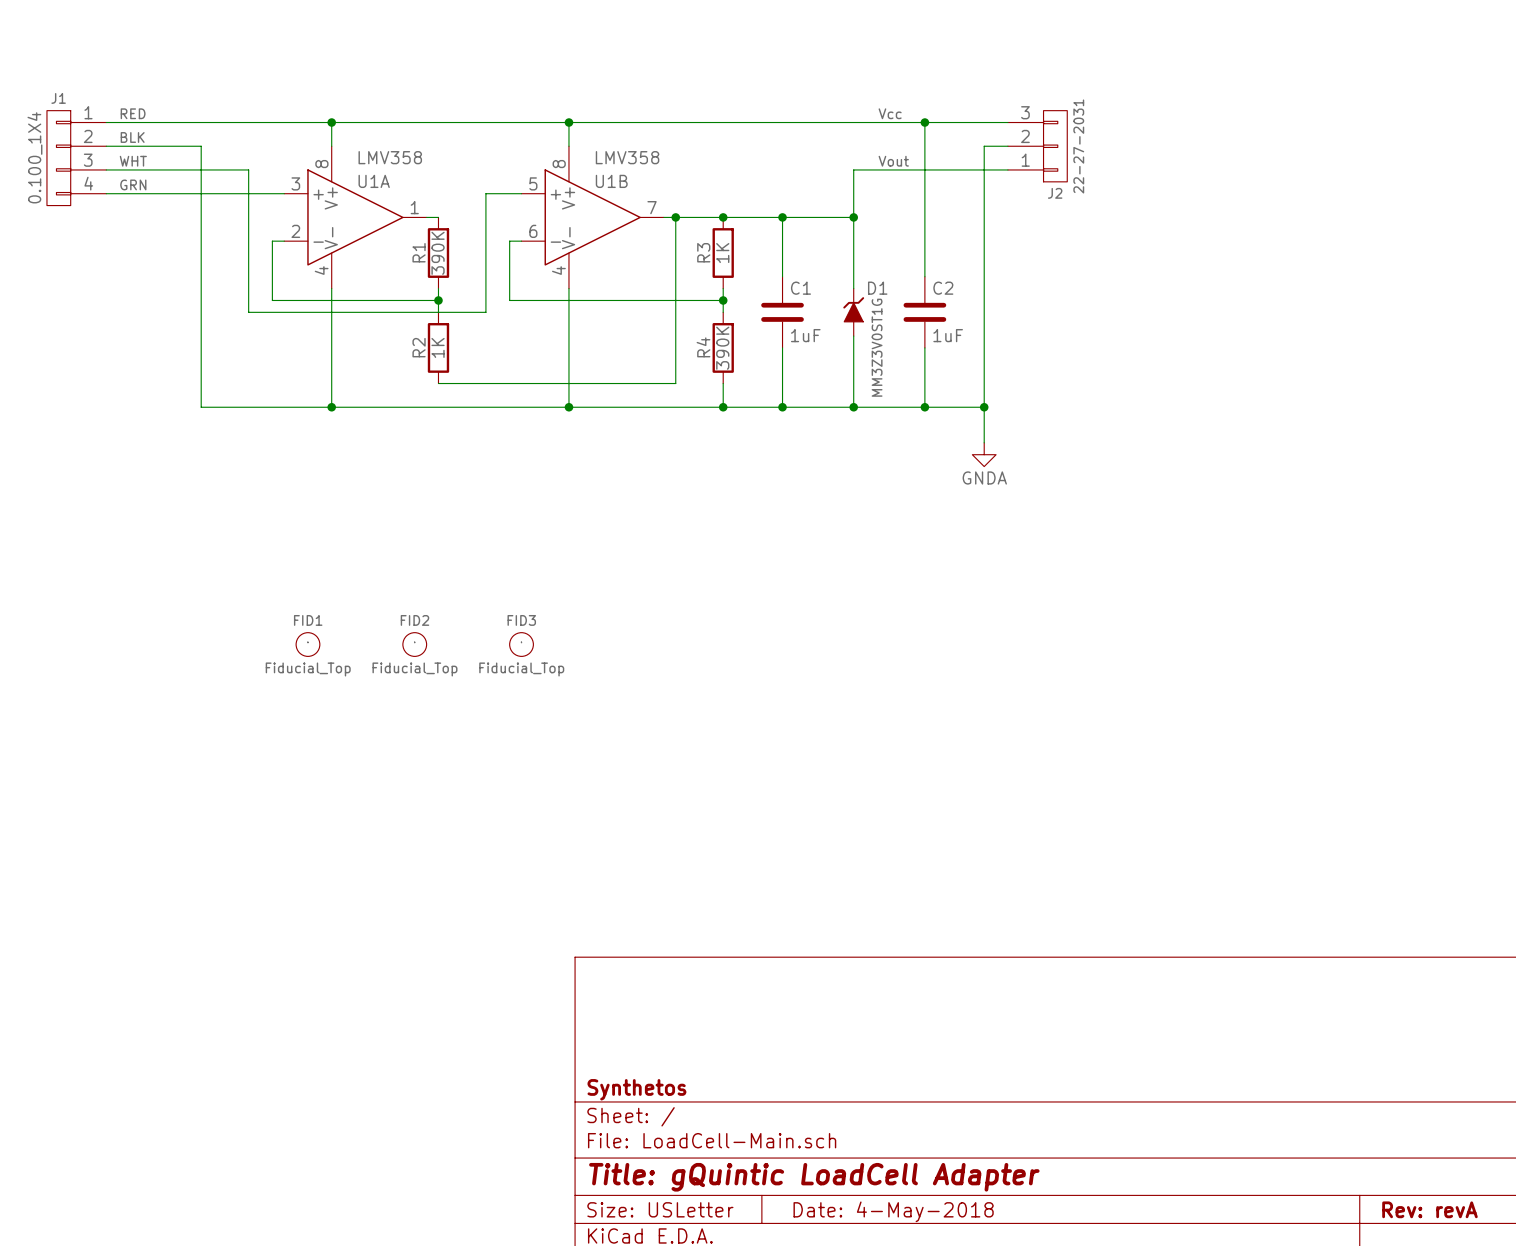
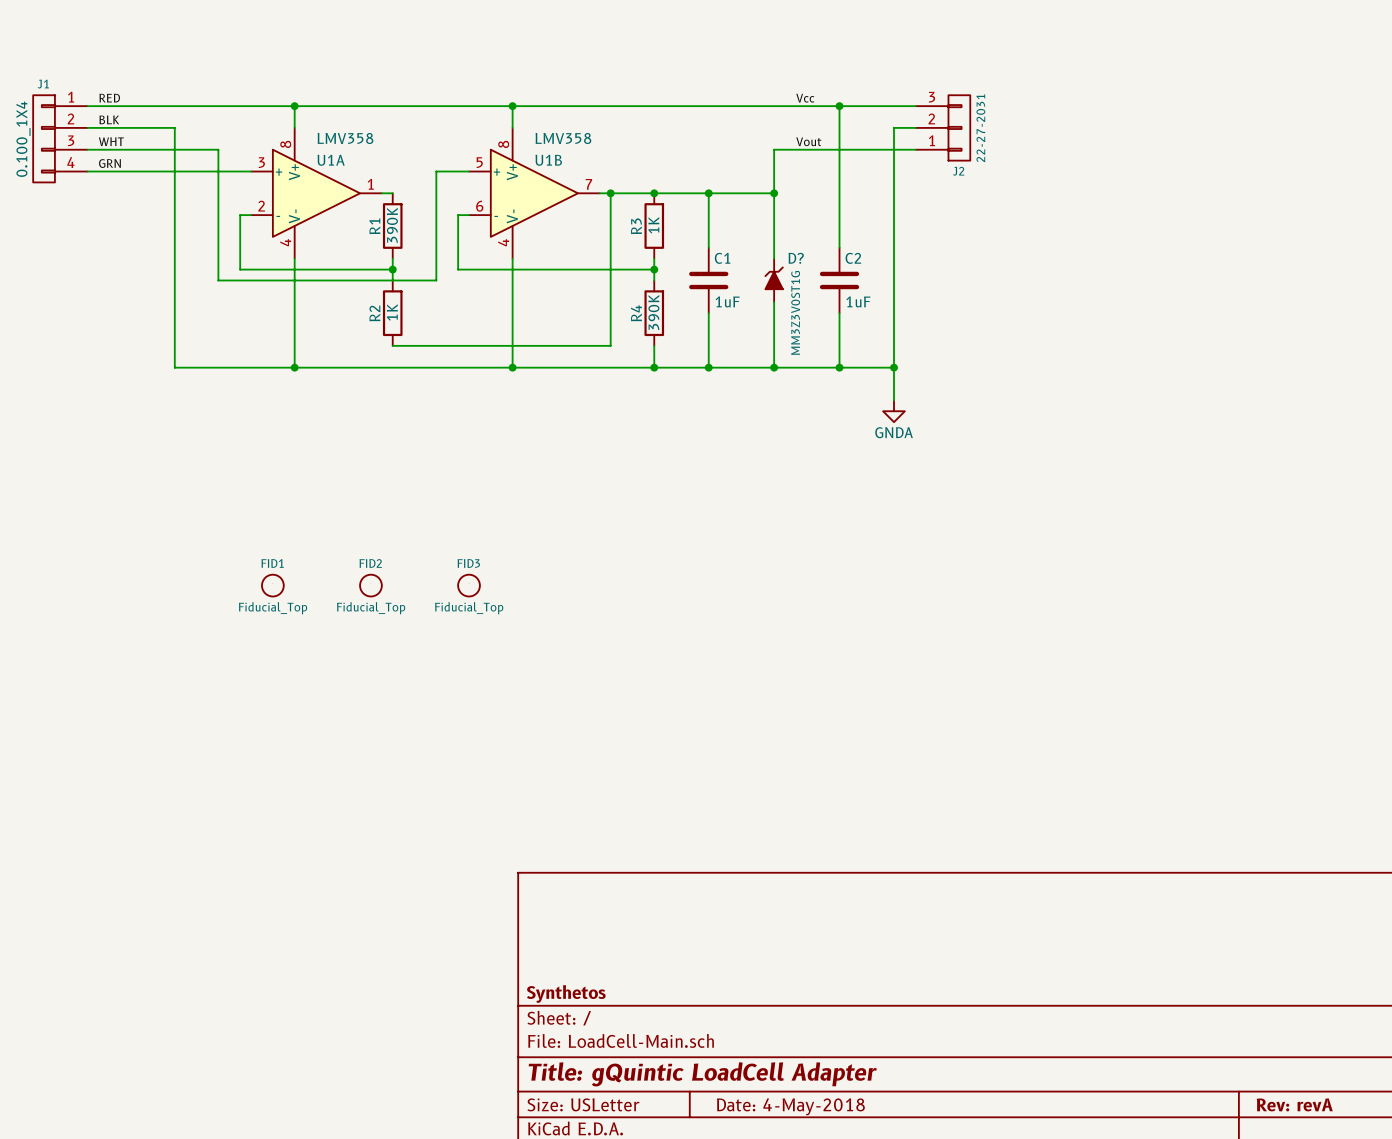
D1 name: D1 (877, 288) -> D? (796, 258)

